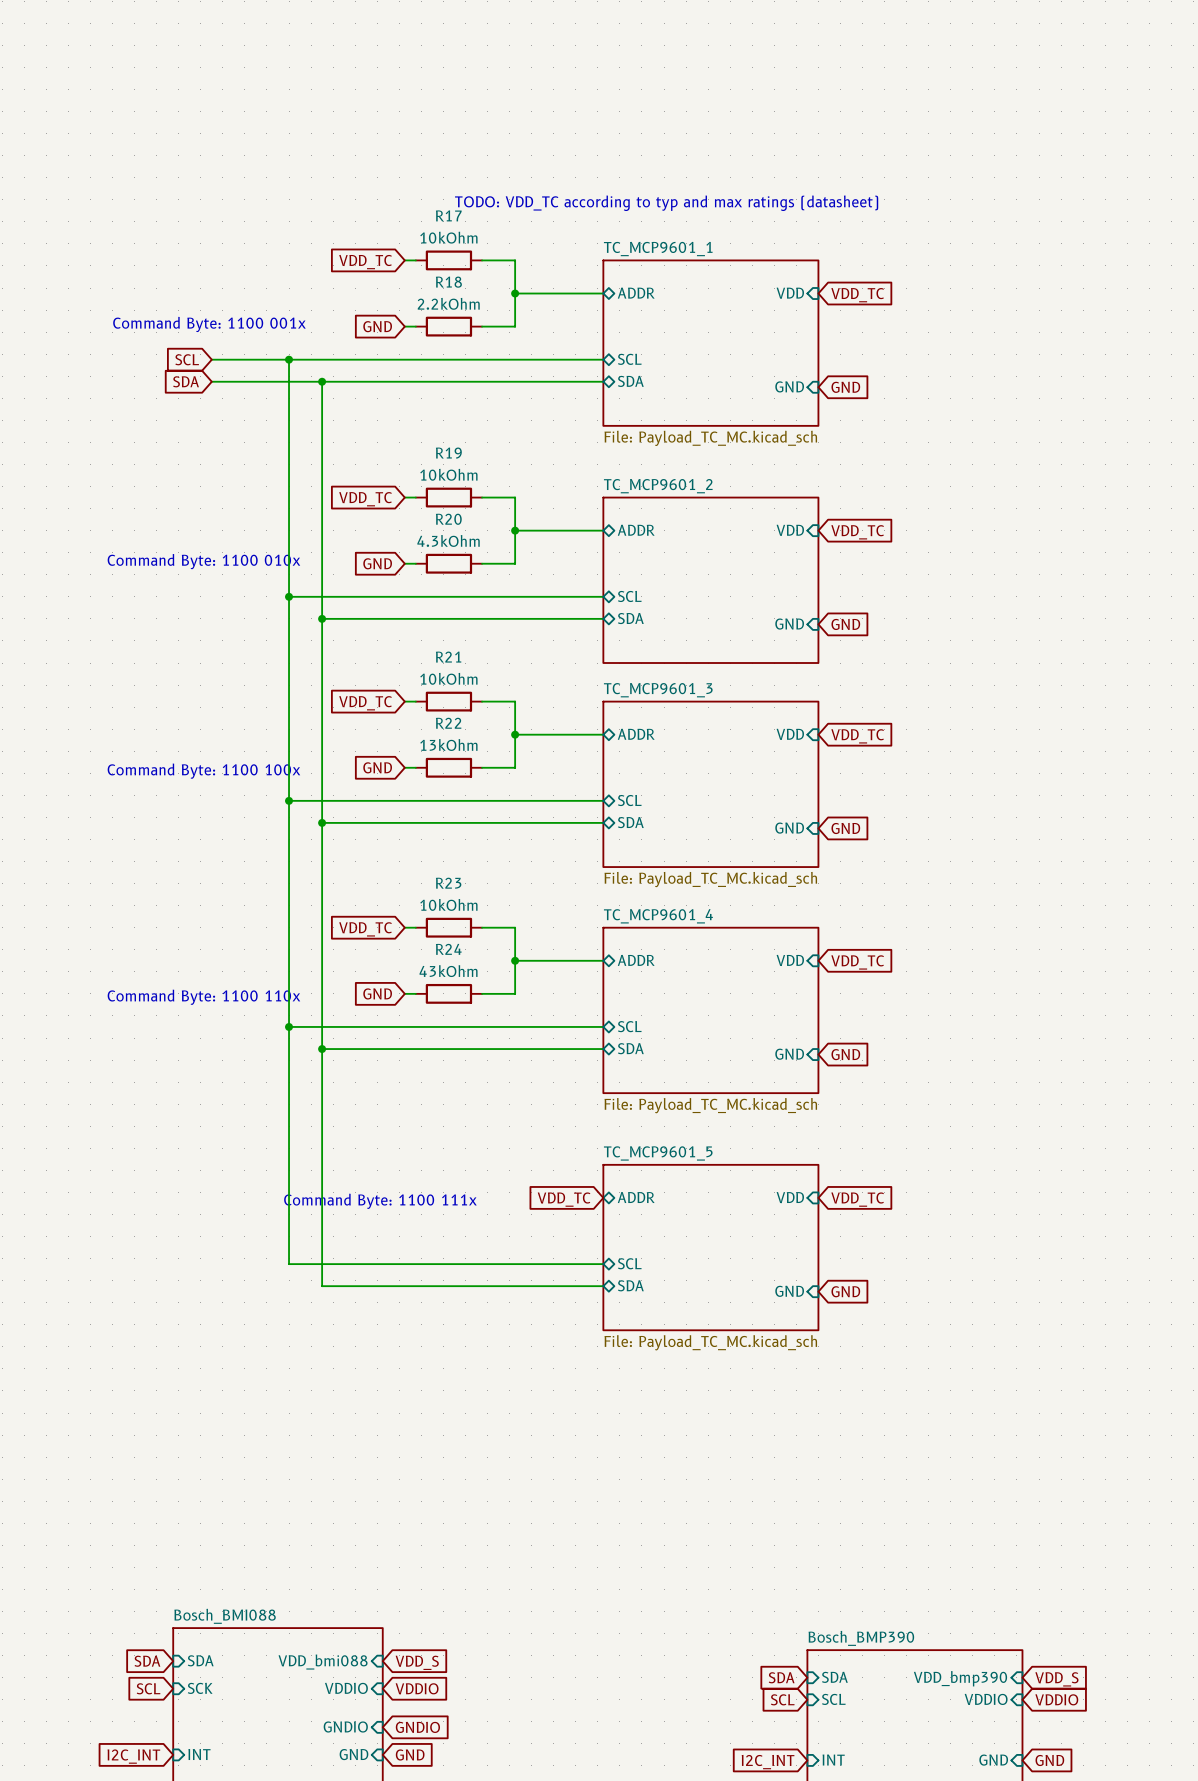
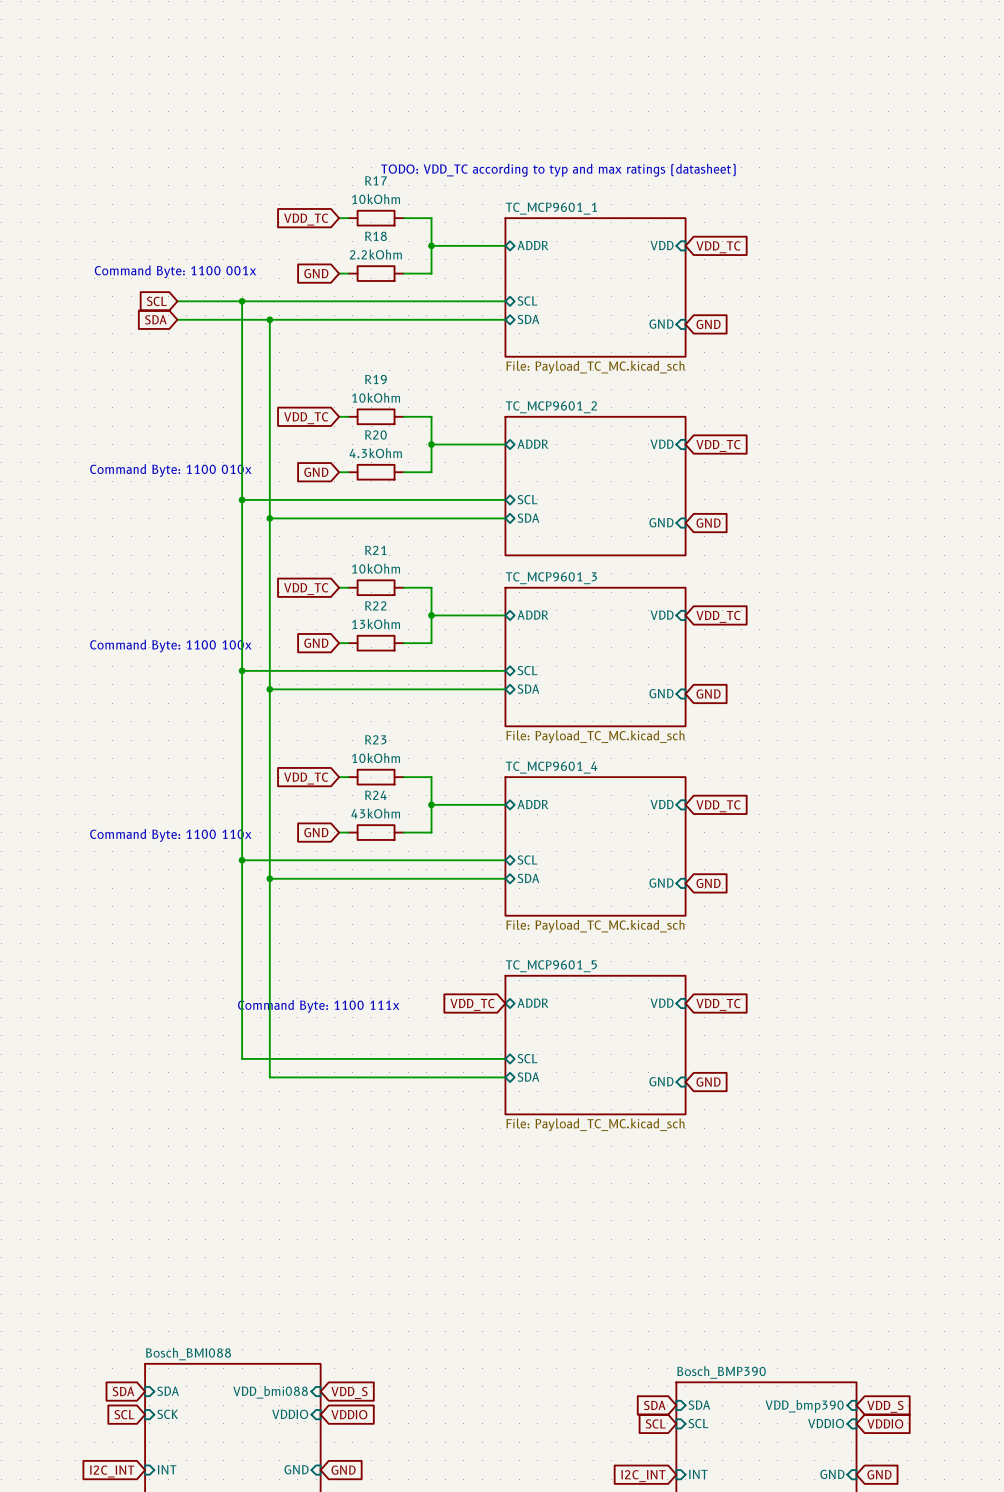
sheet pin: GNDIO (345, 1726) -> none
global label: GNDIO (417, 1727) -> none

